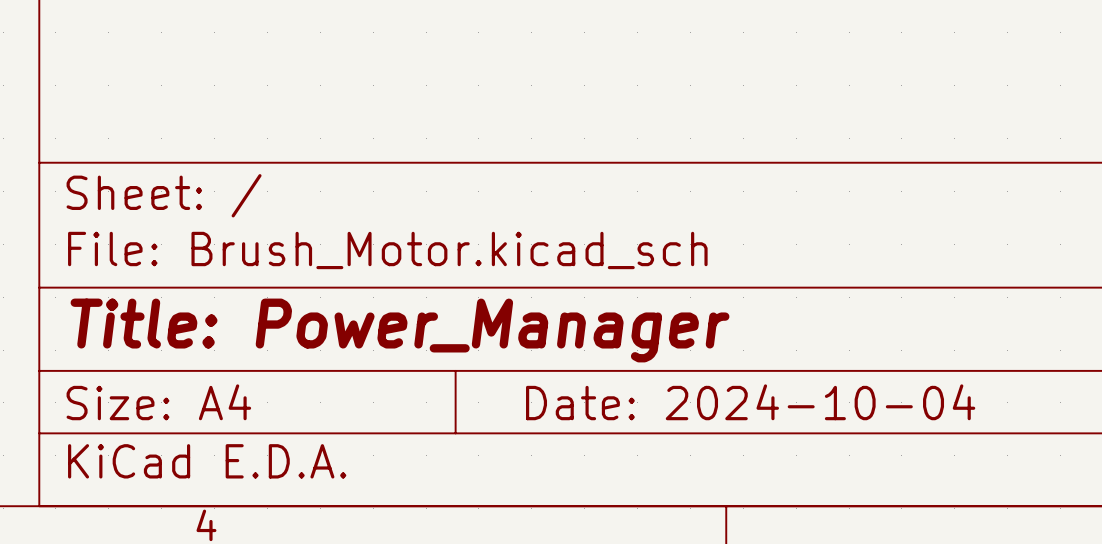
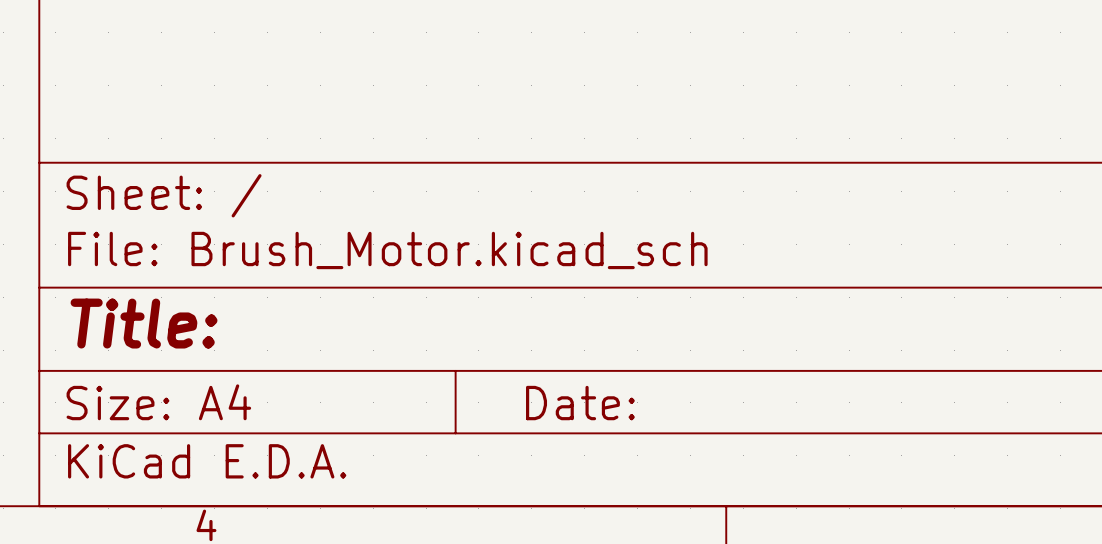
title block: Title: Power_Manager (400, 330) -> Title: (144, 323)
title block: Date: 2024-10-04 (750, 402) -> Date: (580, 403)

